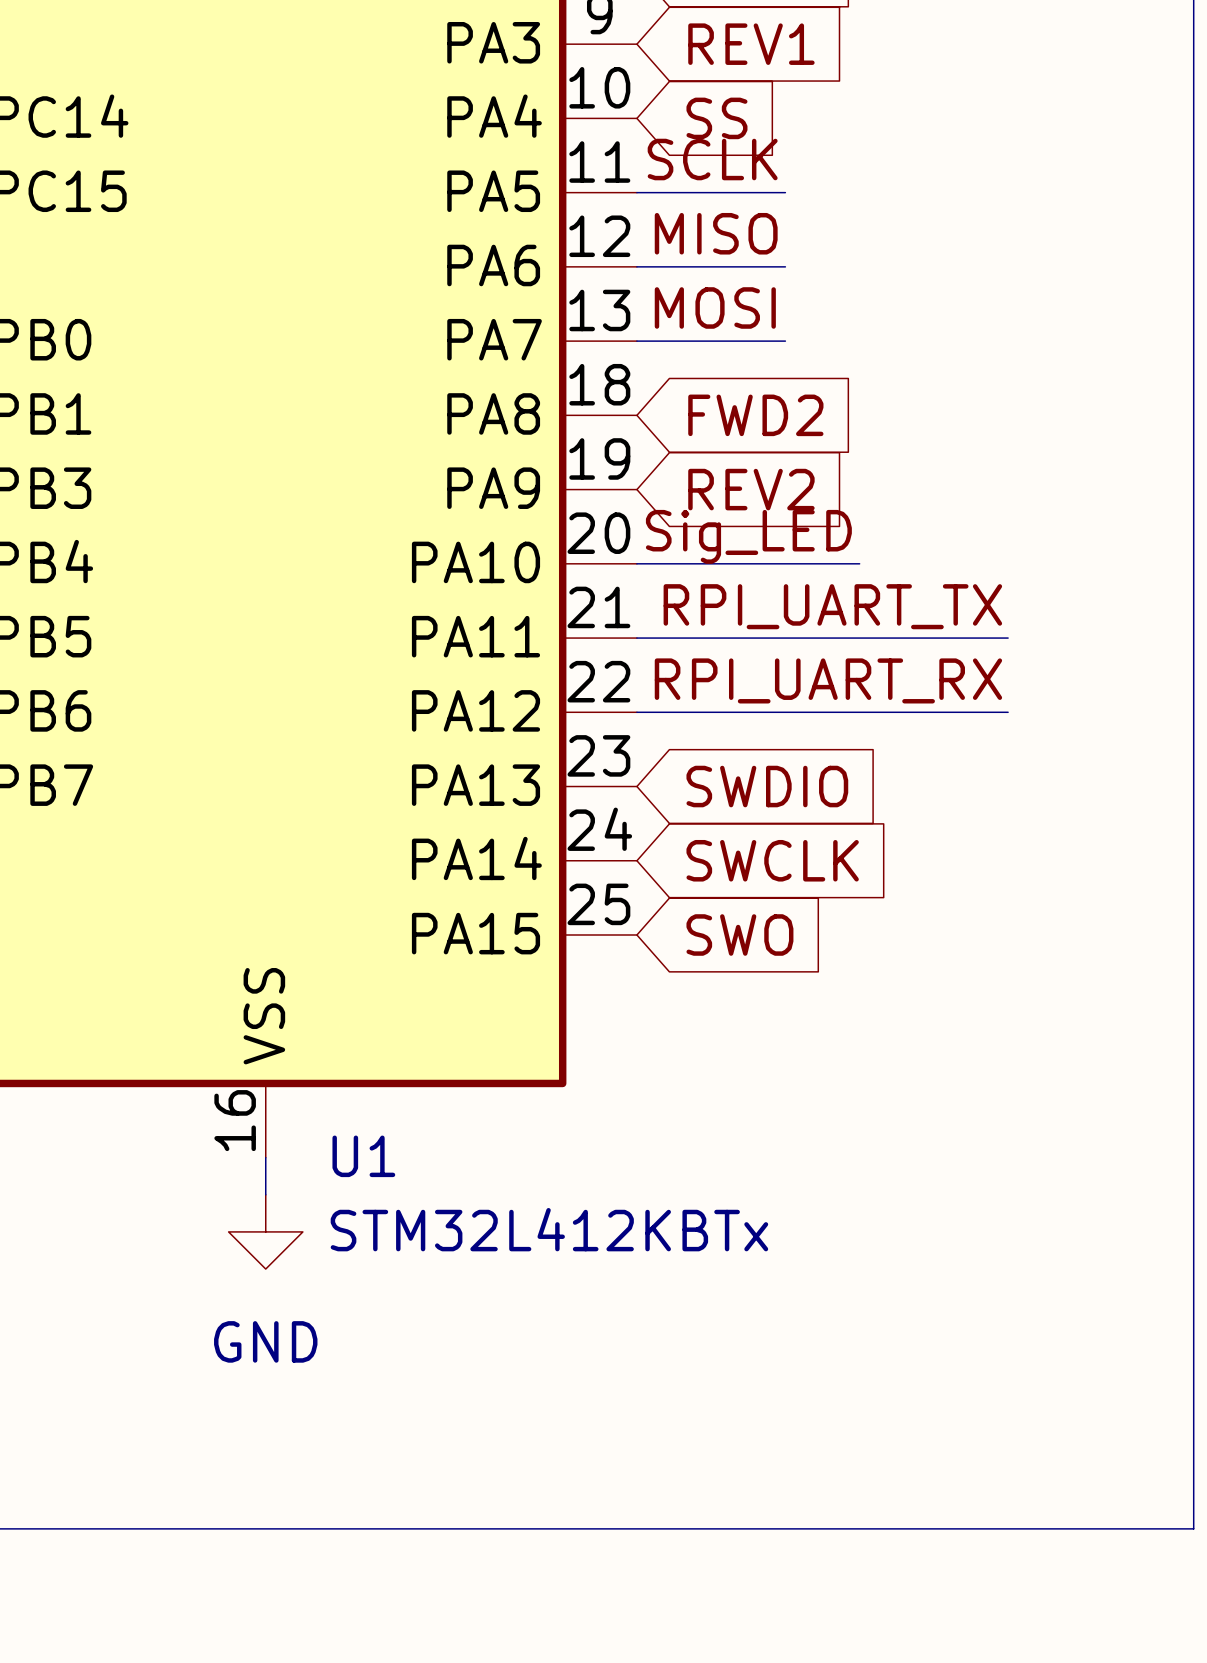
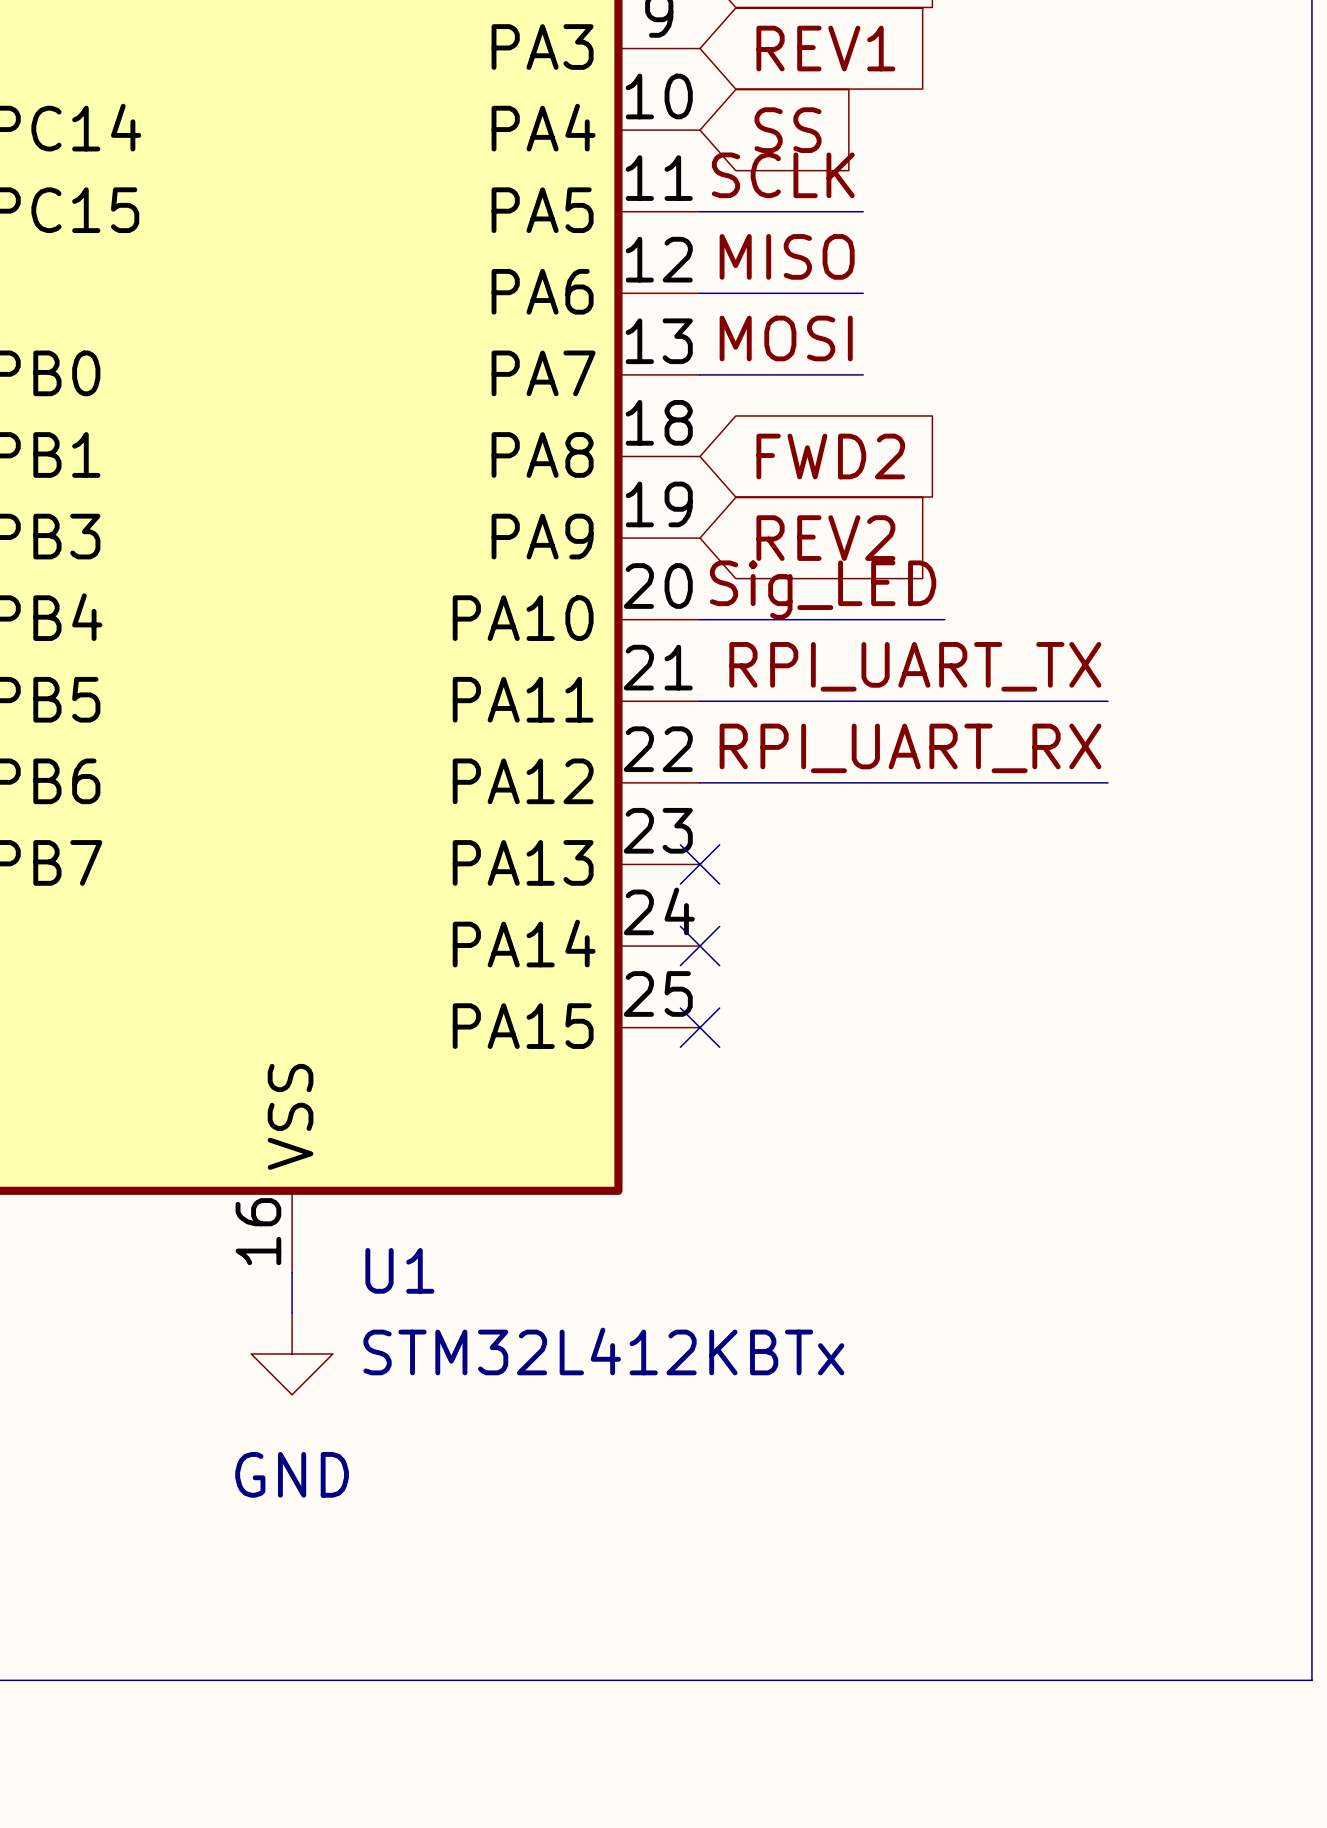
no-connect mark: none -> (700, 864)
global label: SWDIO (767, 786) -> none
no-connect mark: none -> (700, 946)
global label: SWCLK (772, 860) -> none
no-connect mark: none -> (700, 1027)
global label: SWO (739, 934) -> none

